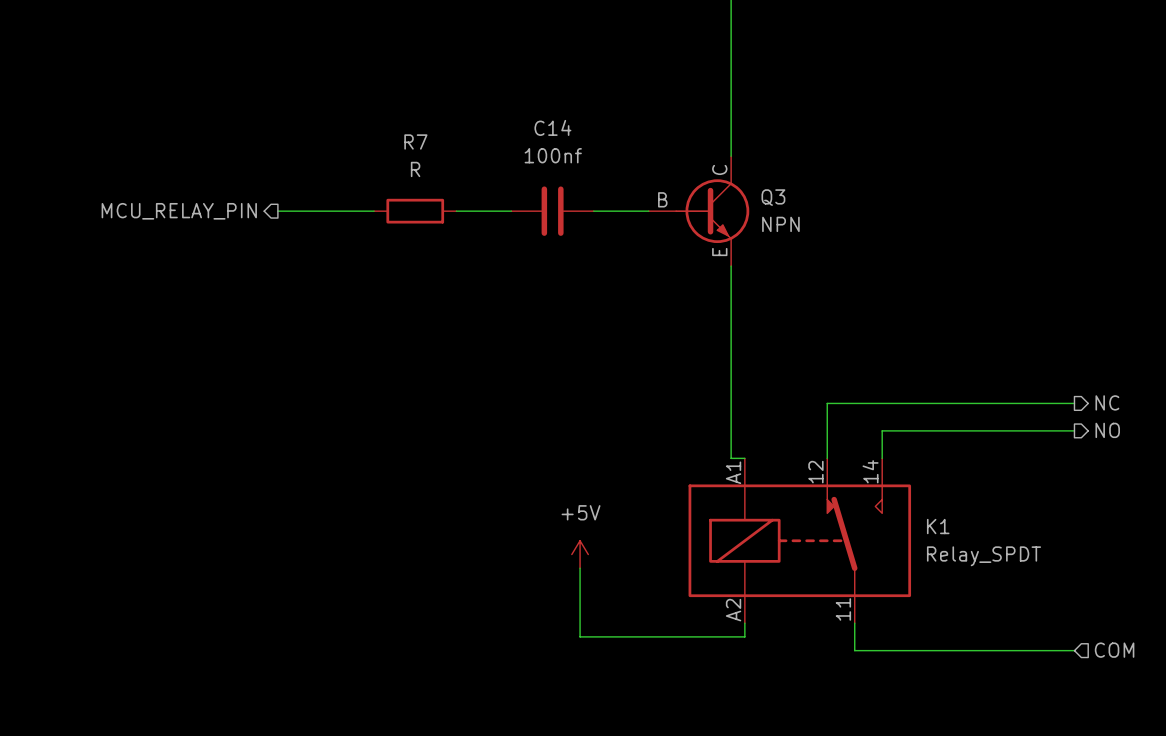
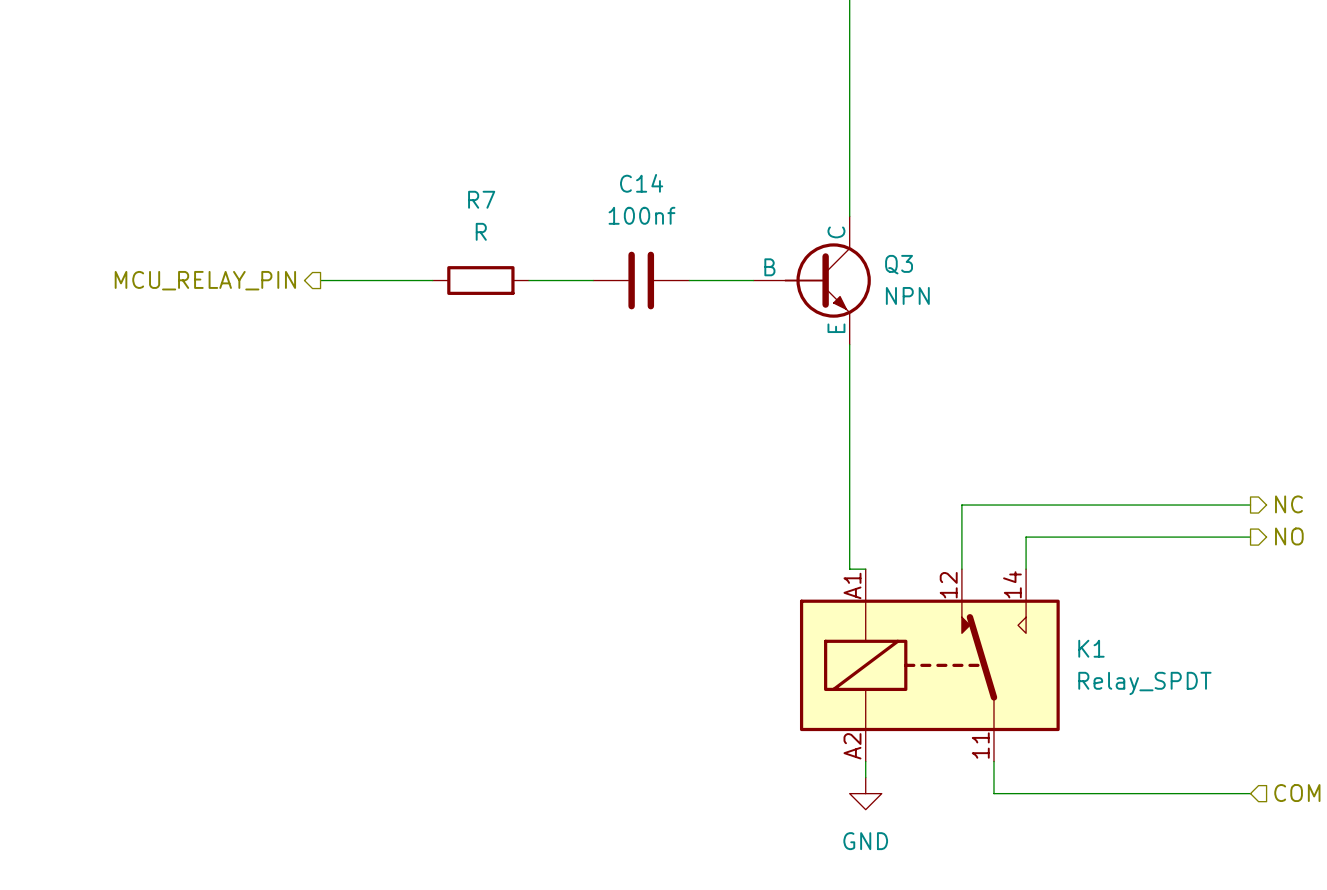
power symbol: +5V (580, 554) -> none
wire: (580, 568) (580, 636) (744, 636) -> none
power symbol: none -> GND (865, 793)

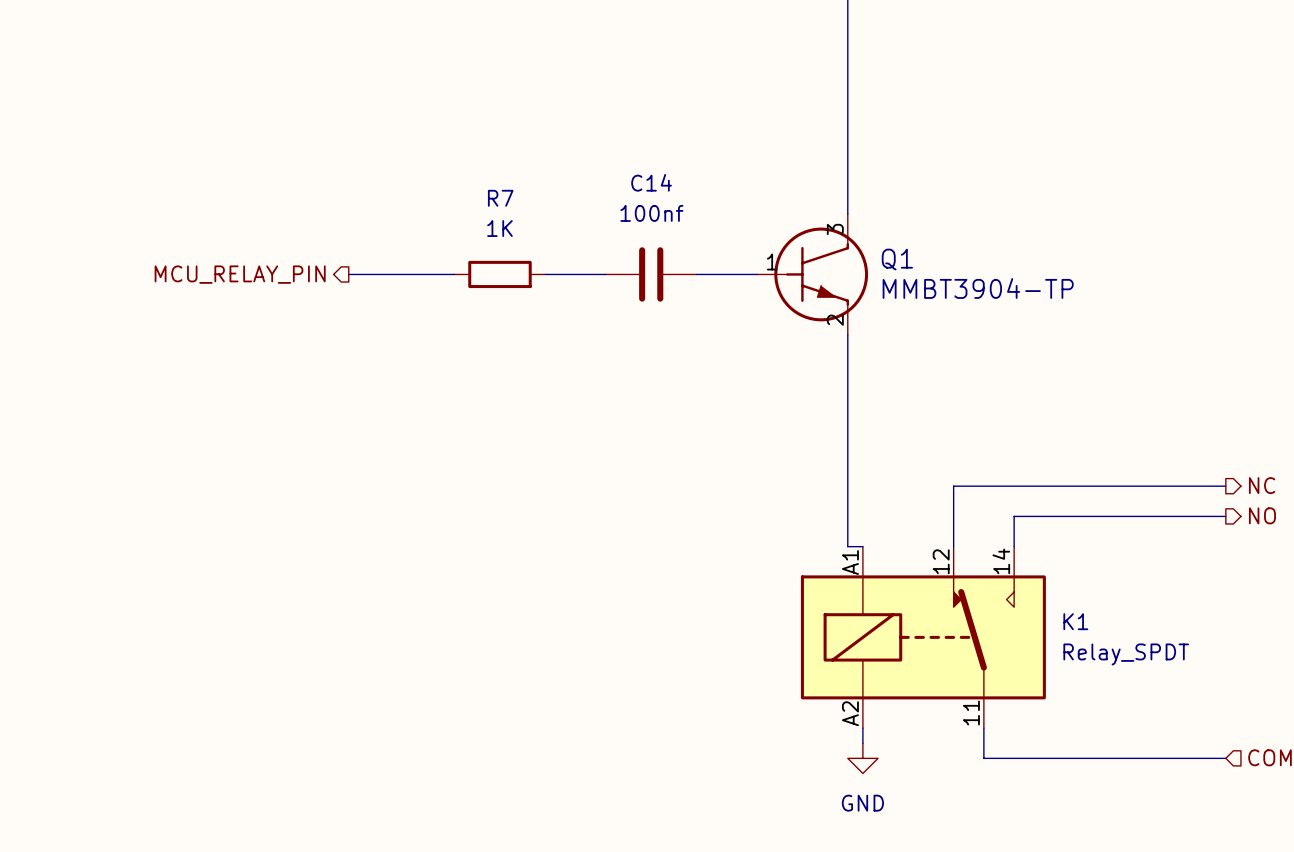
R7 value: R (481, 231) -> 1K (499, 228)
Q3: NPN (812, 280) -> none
Q1: none -> MMBT3904-TP (812, 274)

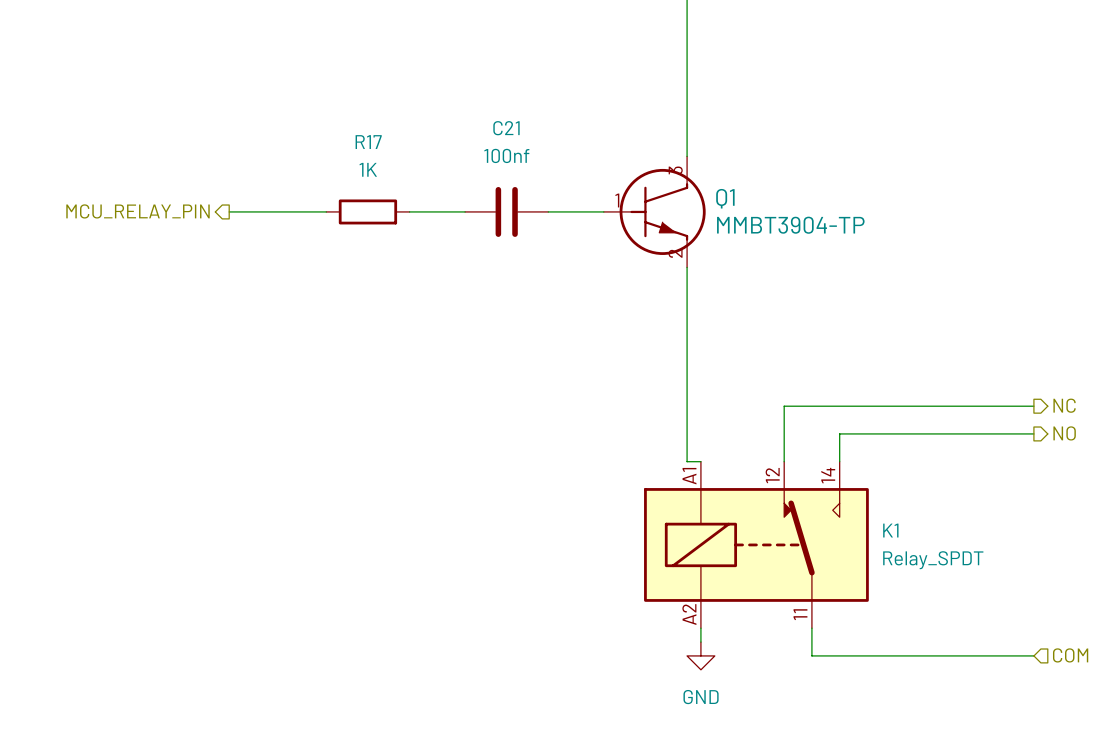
C14 name: C14 (651, 182) -> C21 (506, 128)
R7 name: R7 (500, 198) -> R17 (368, 142)

